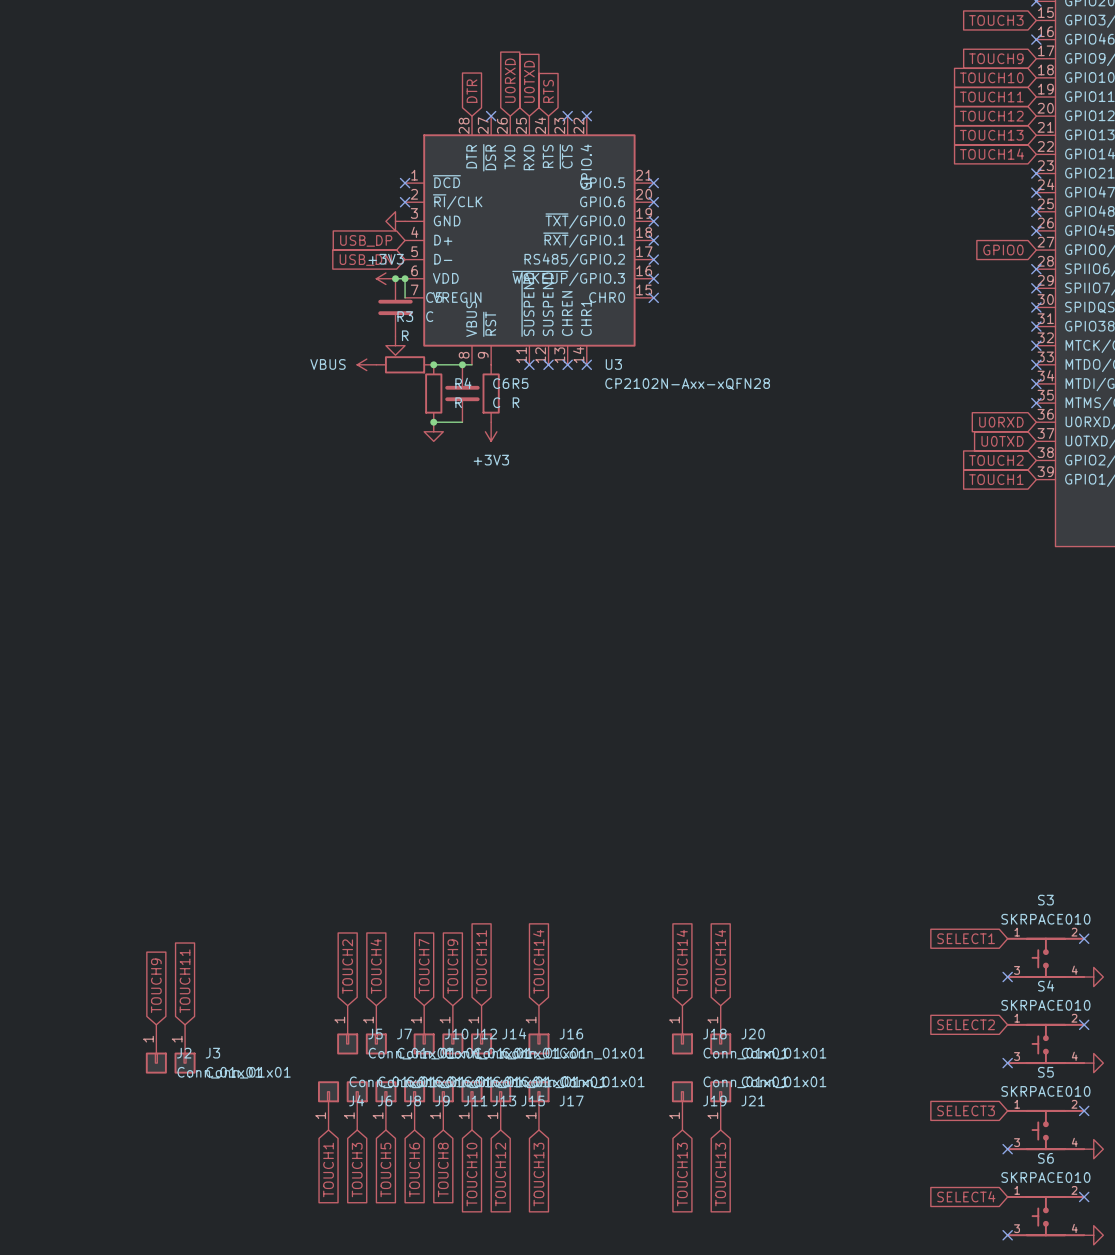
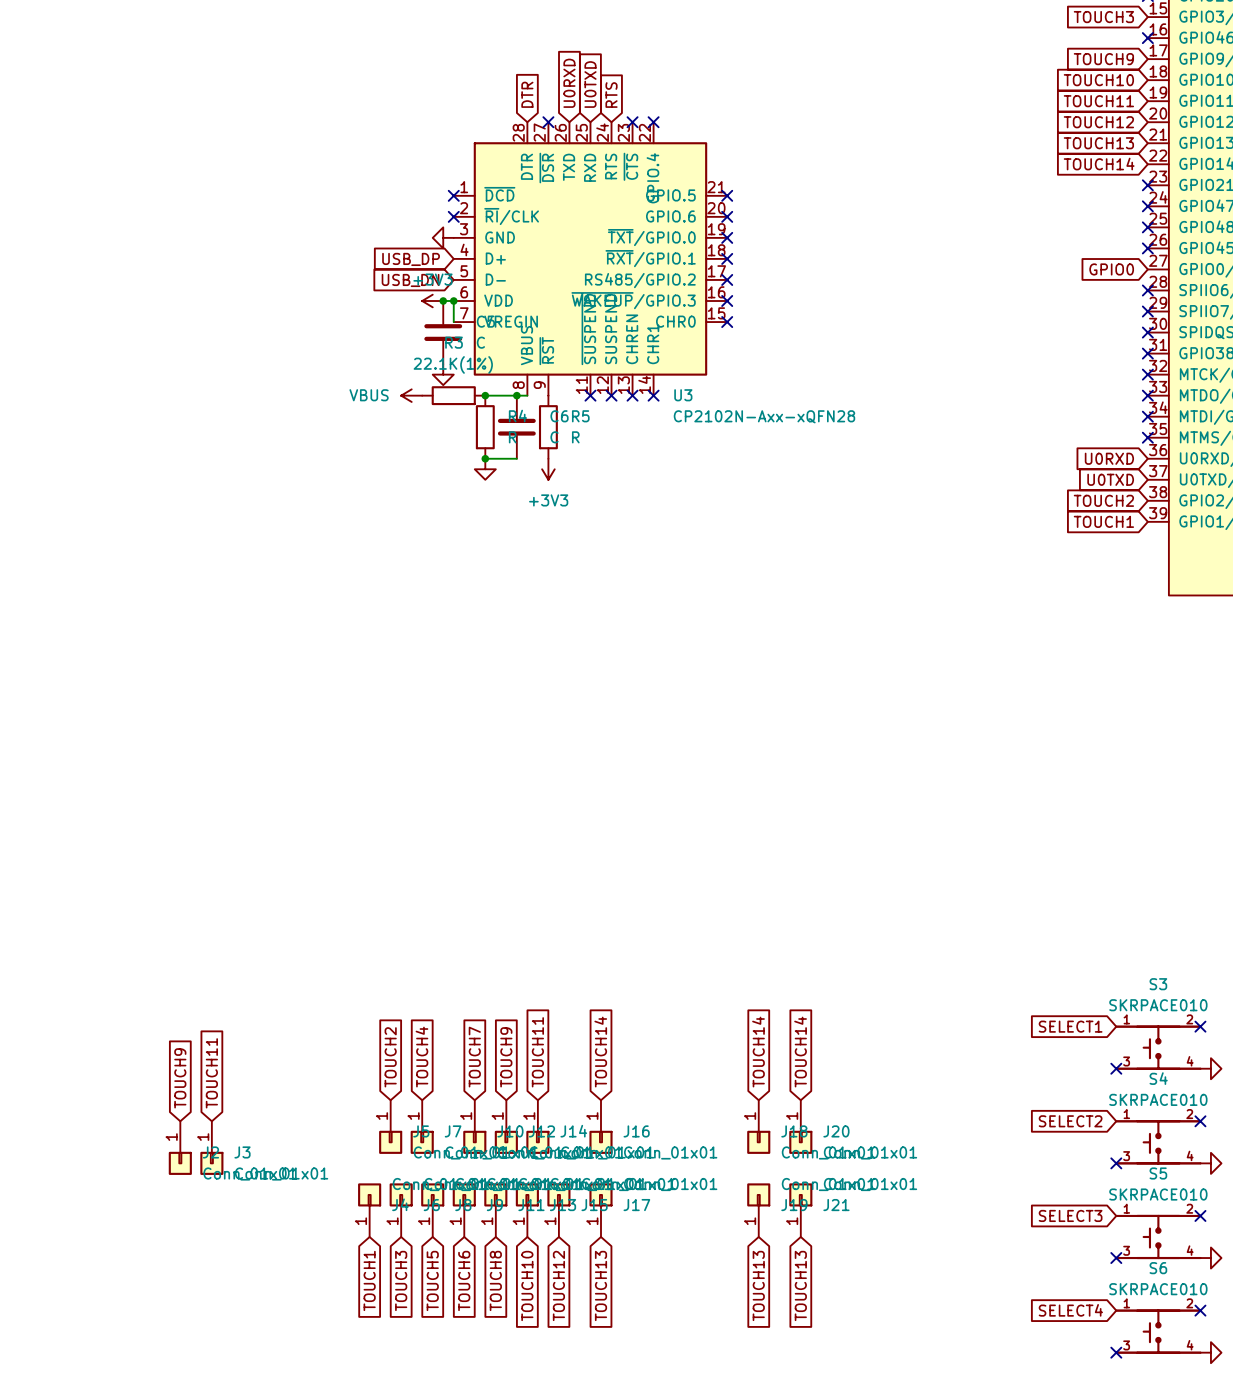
R3 value: R (405, 335) -> 22.1K(1%) (453, 364)

